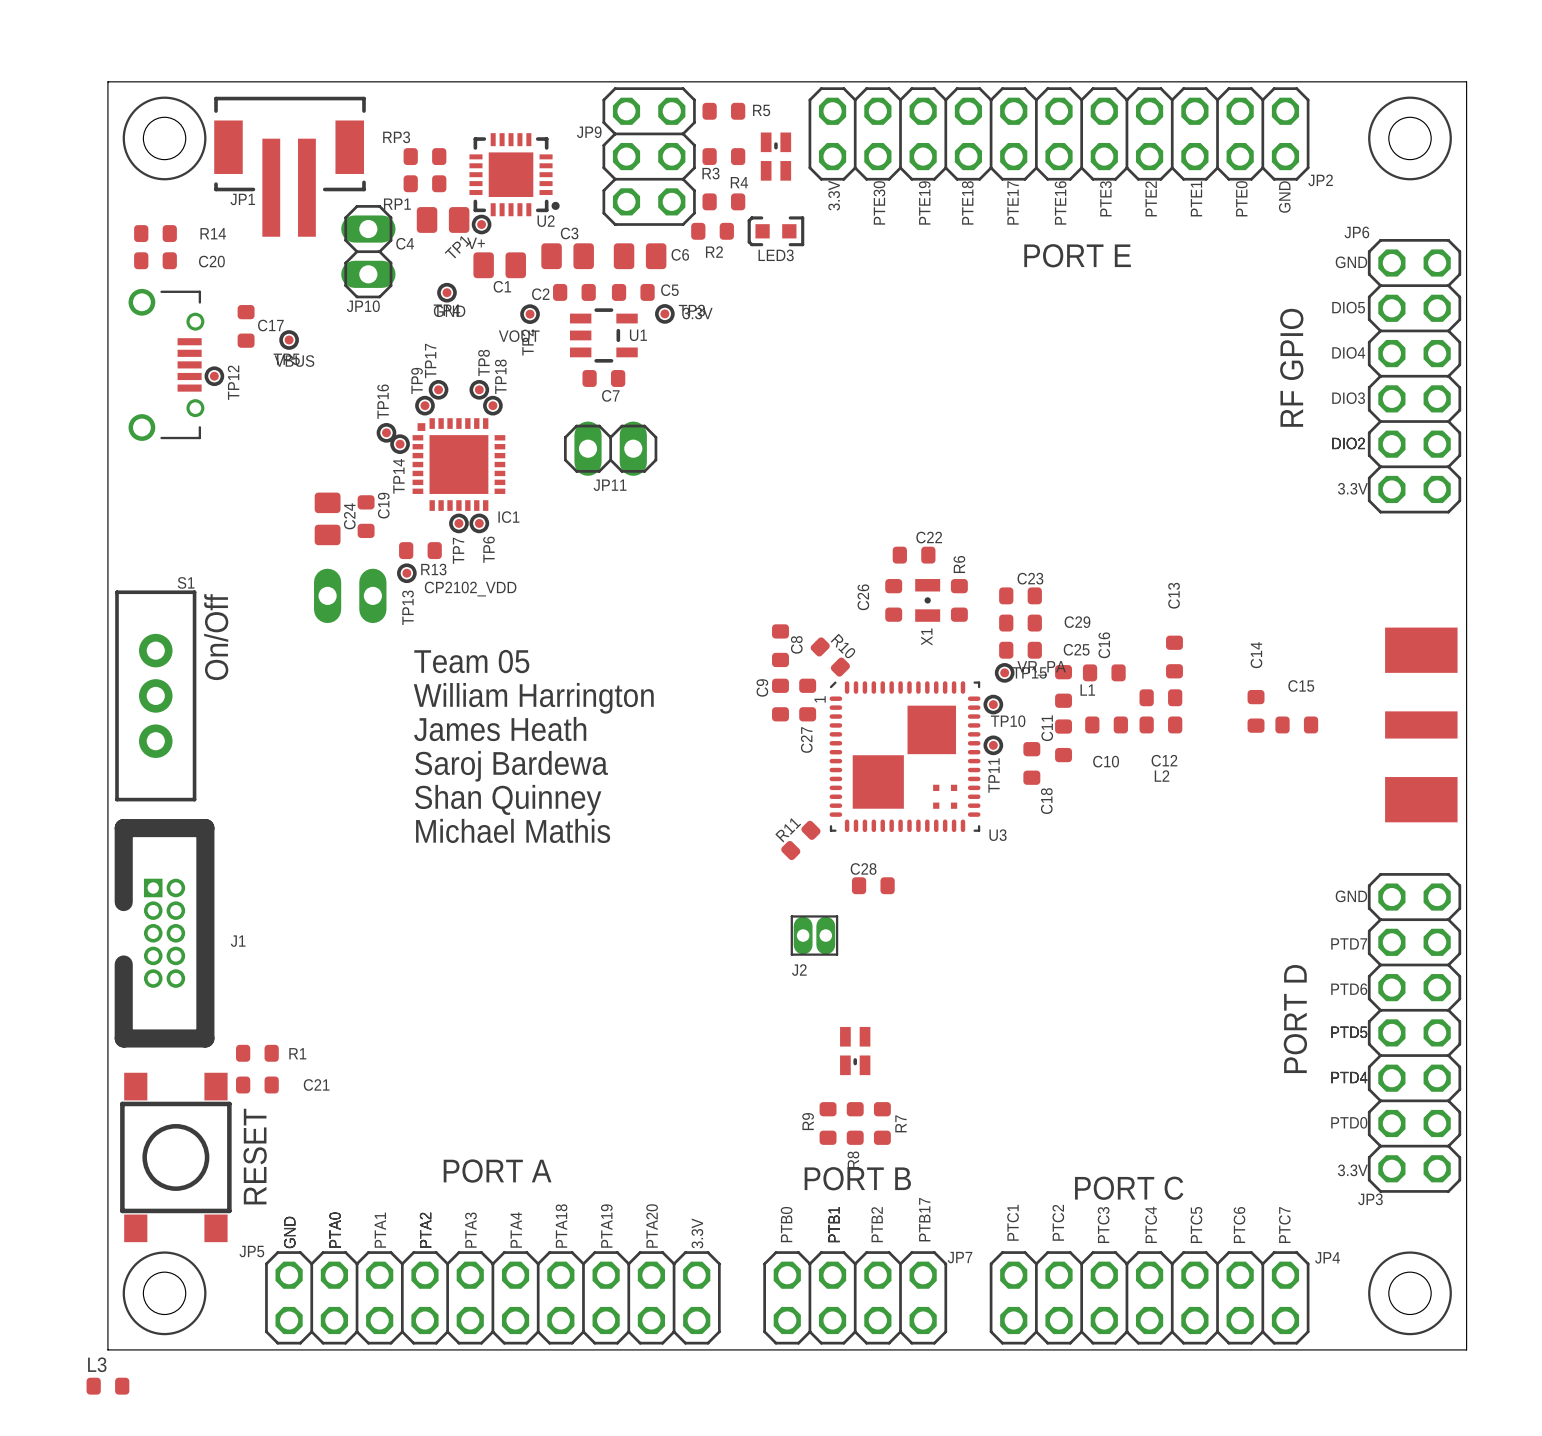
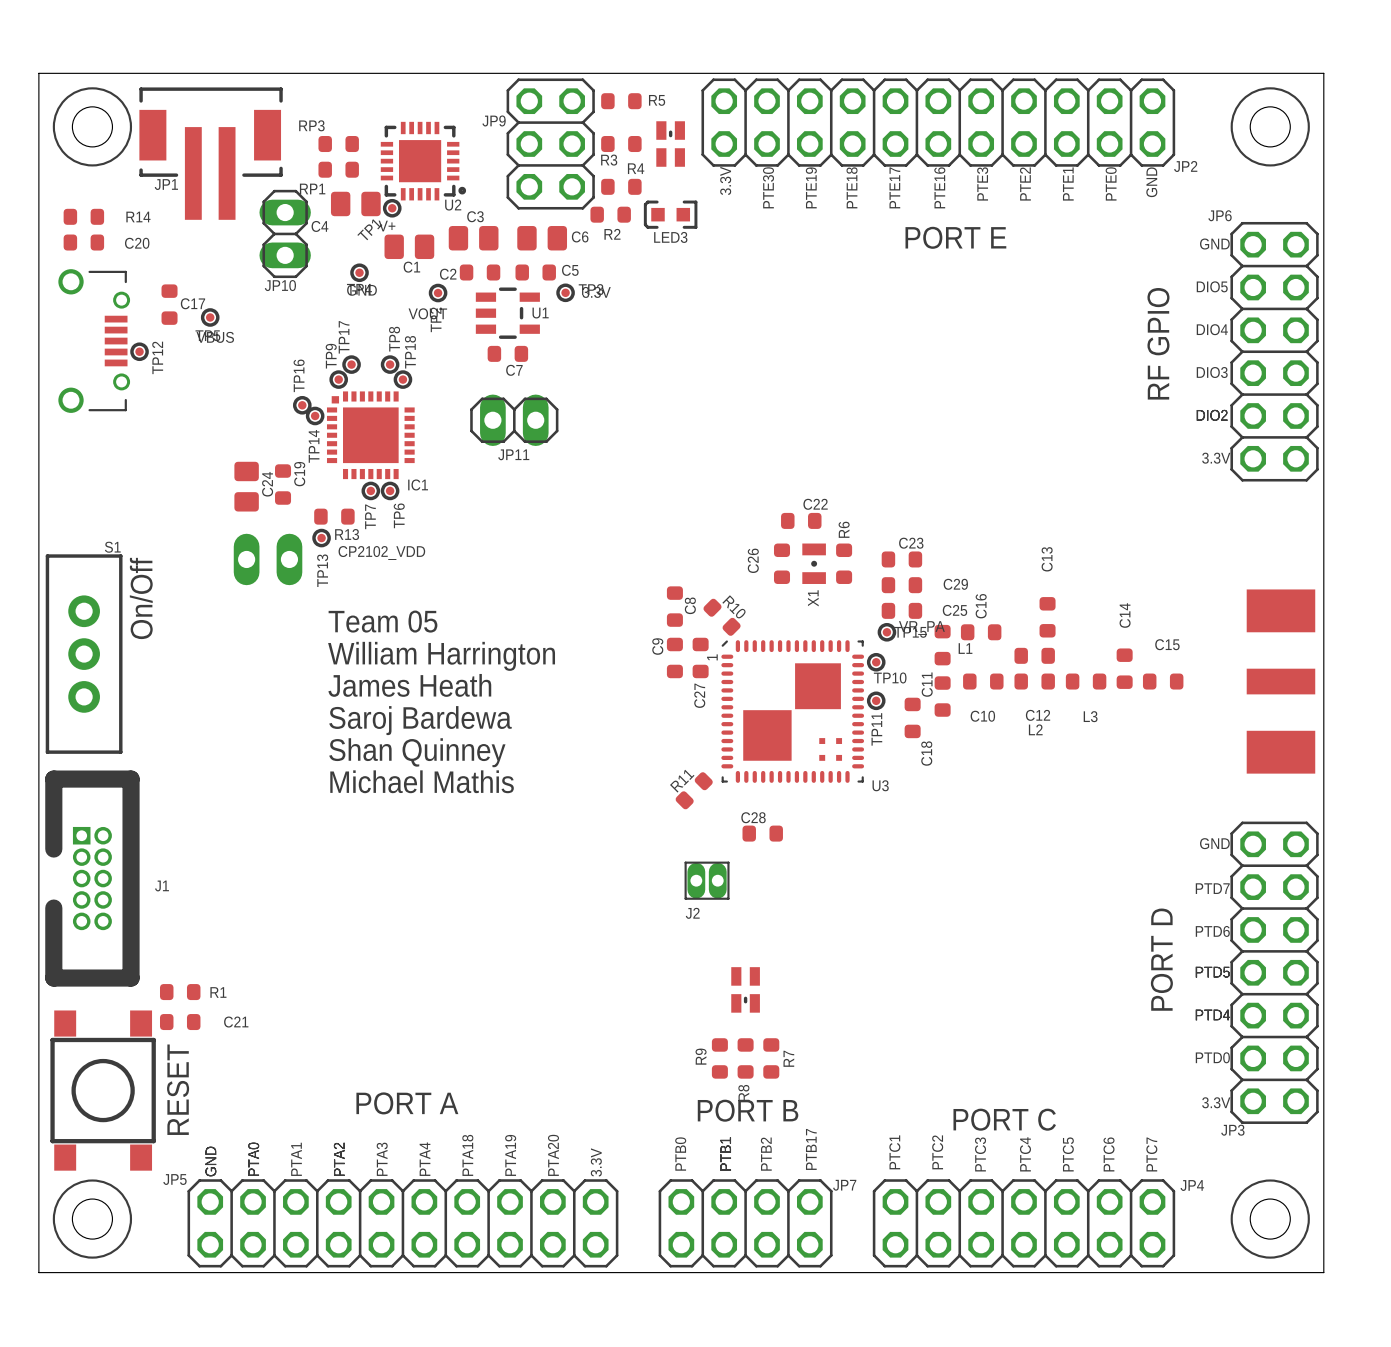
L3 name position: L3 (97, 1364) -> L3 (1090, 716)
L3 position: (107, 1386) -> (1086, 681)

